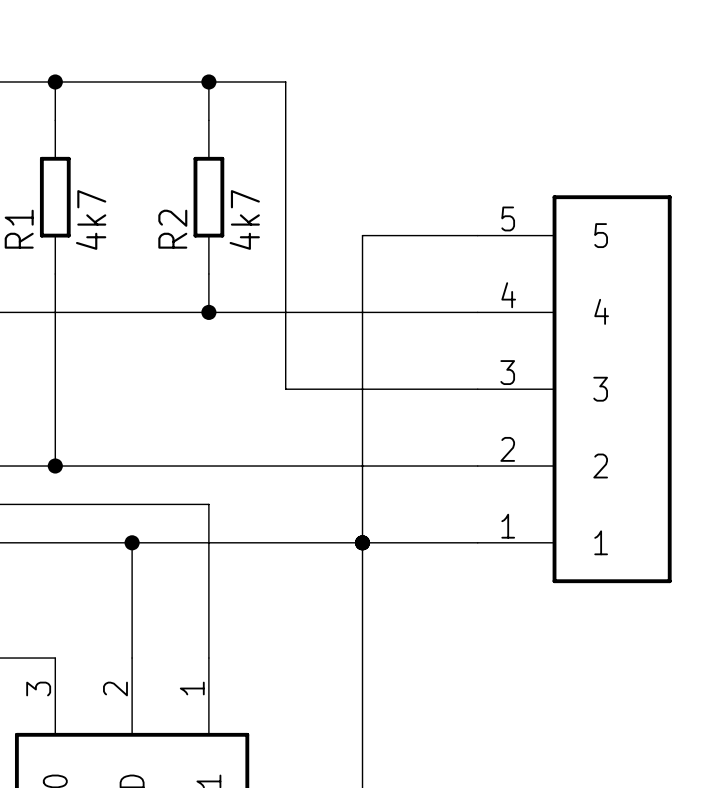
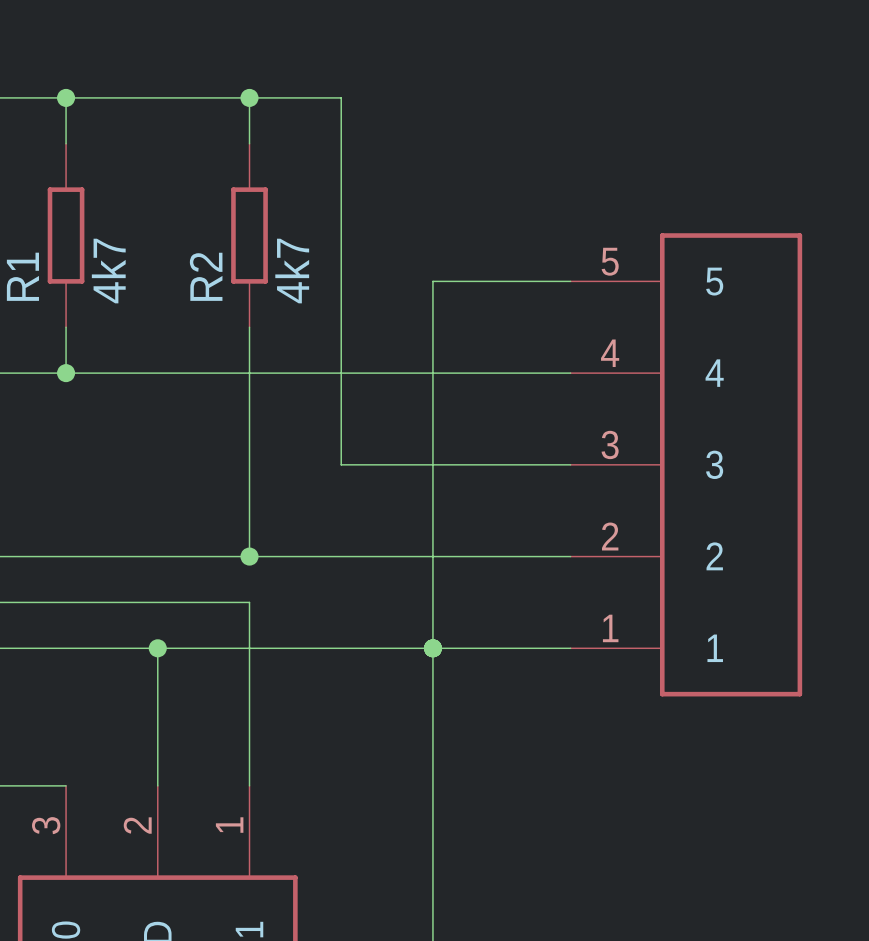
wire: (55, 312) (55, 466) -> (249, 373) (249, 556)
junction: none -> (66, 373)
junction: (208, 312) -> none
junction: (55, 466) -> none
junction: none -> (249, 556)

